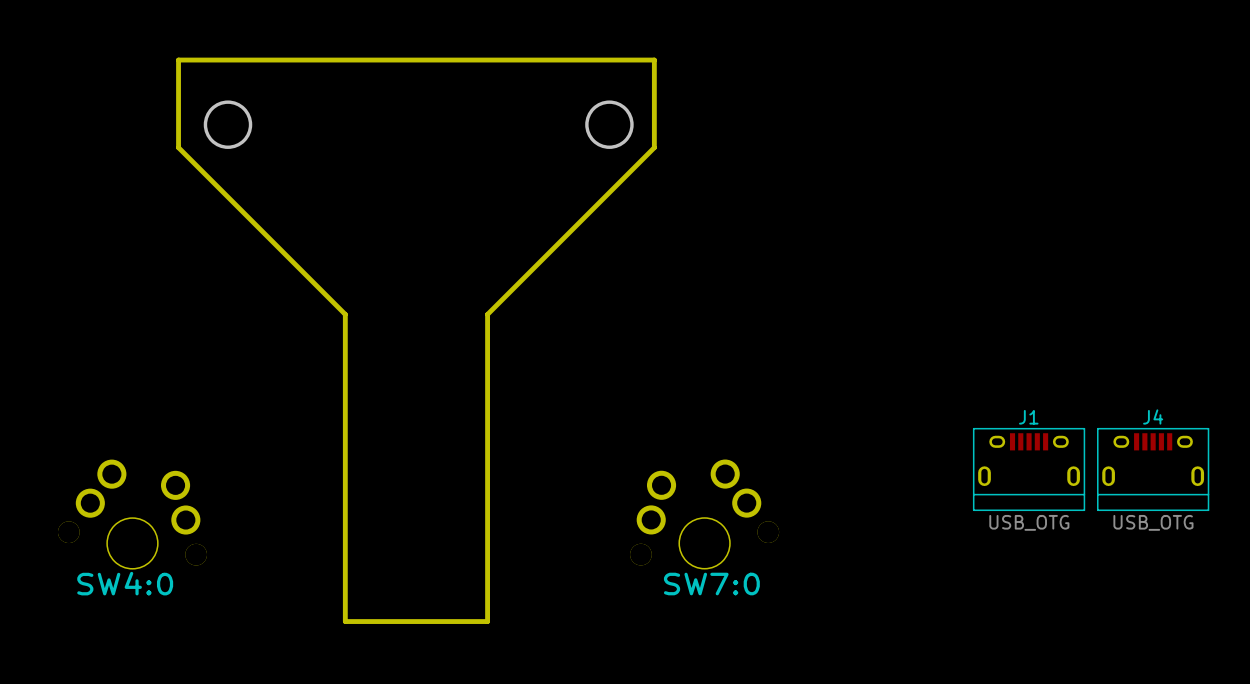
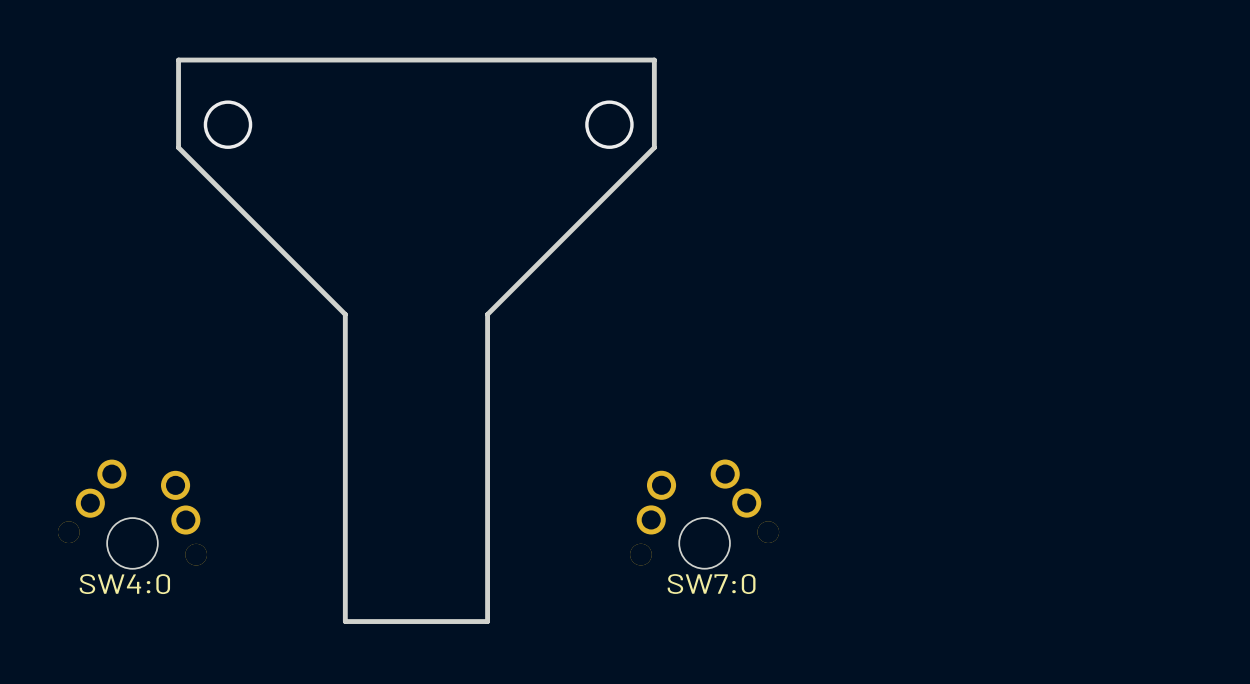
J1: USB_OTG (1029, 469) -> none
J4: USB_OTG (1153, 469) -> none

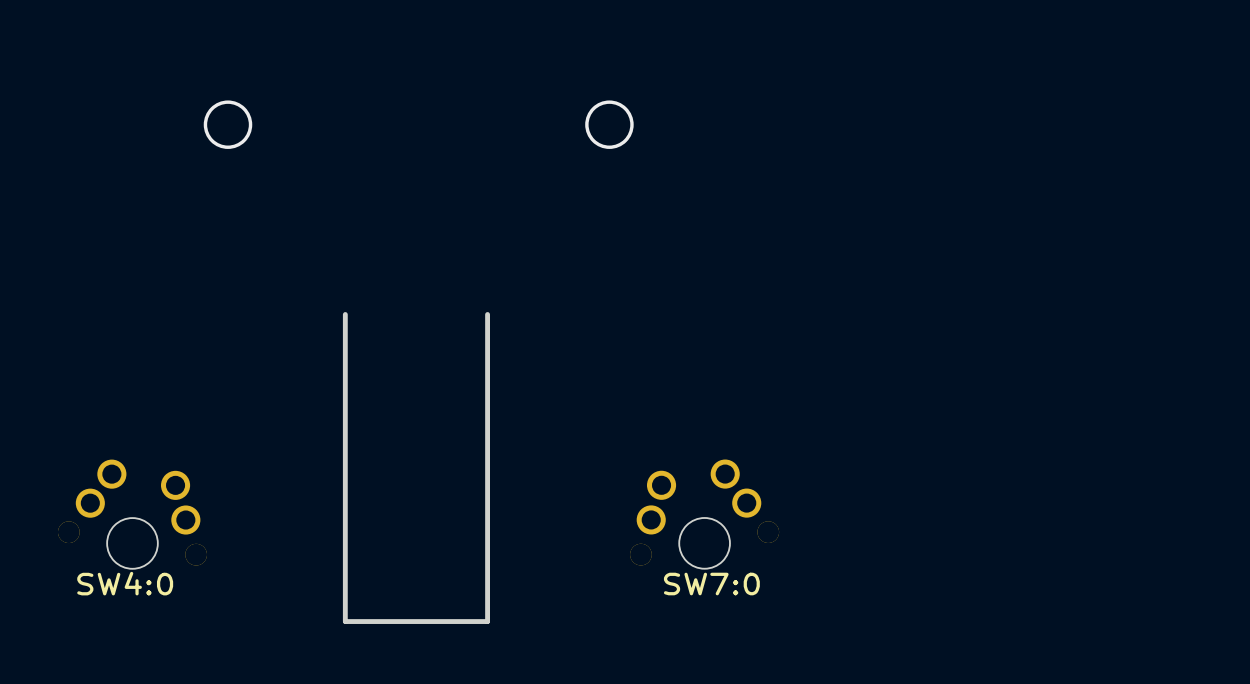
board edge: (345, 314) (178, 147) (178, 60) (654, 60) (654, 147) (487, 314) -> none

